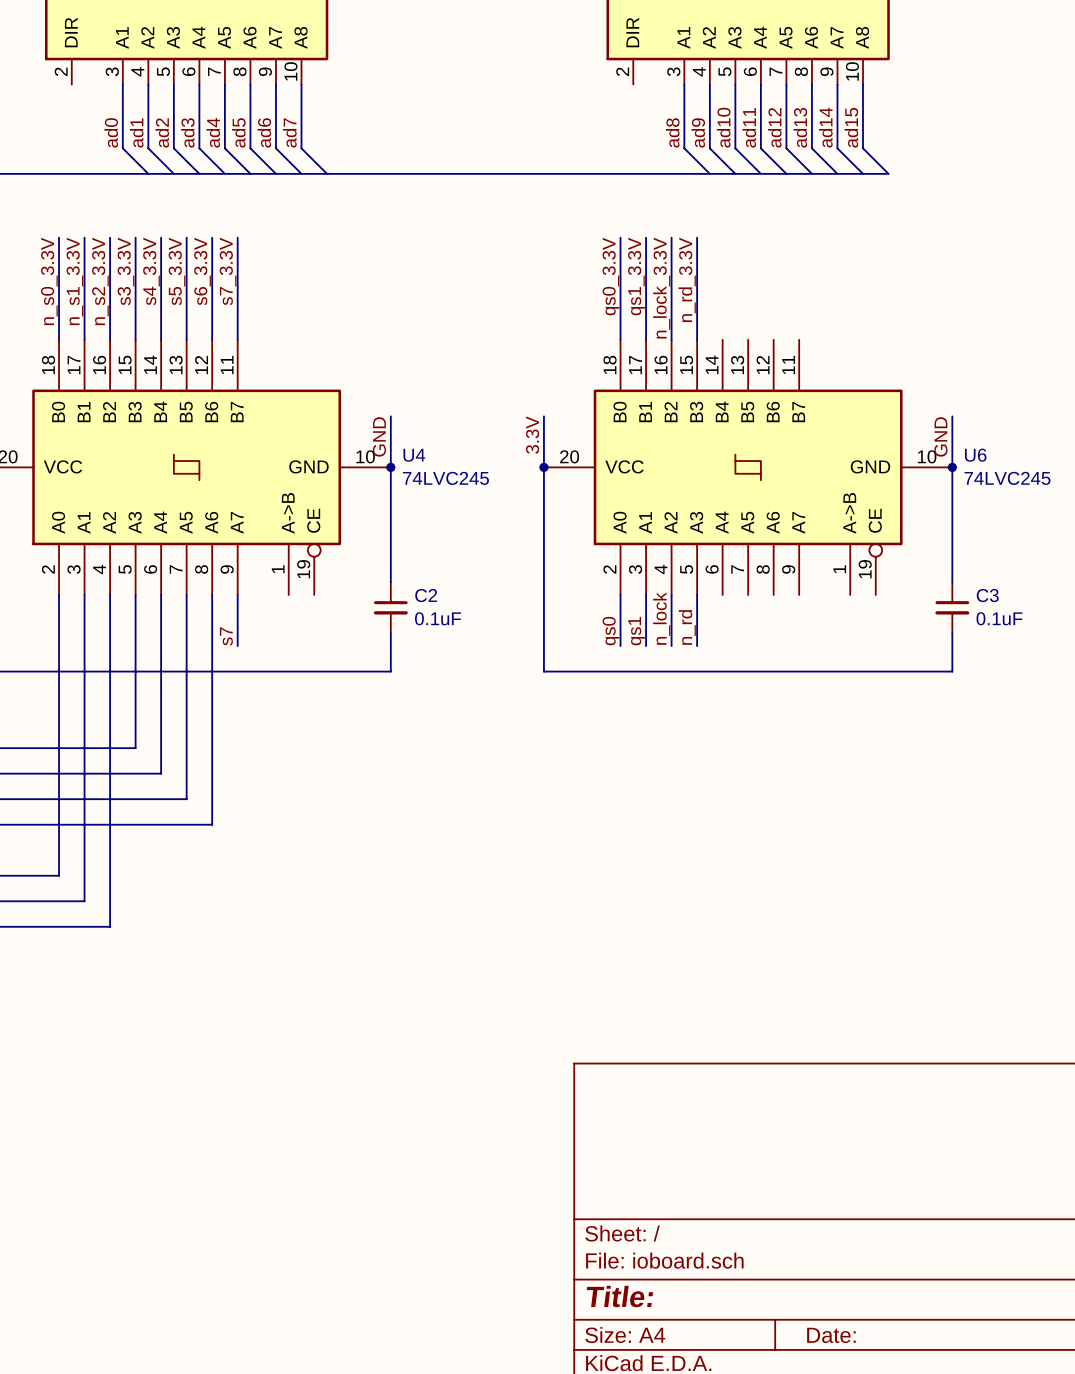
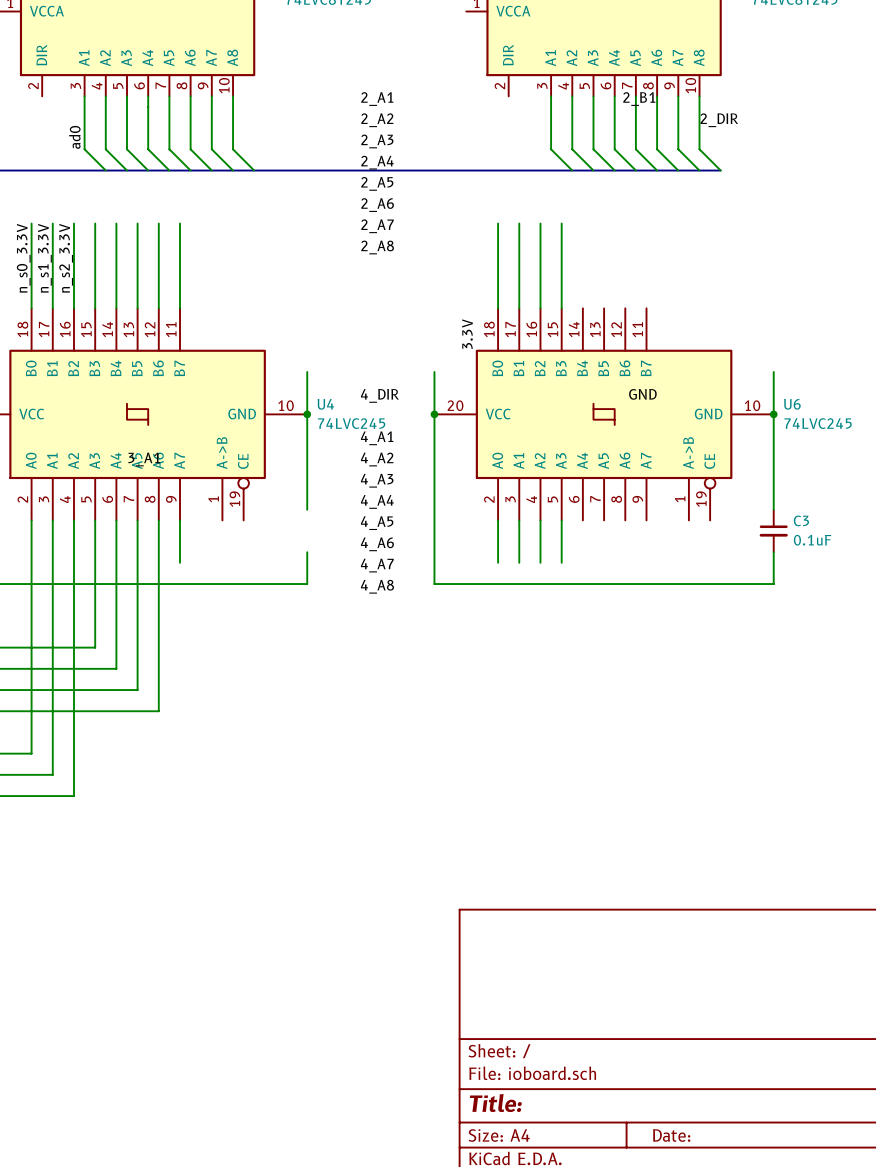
label: none -> 2_A1 (377, 99)
label: none -> 2_B1 (639, 99)
label: none -> 2_A2 (377, 120)
label: none -> 2_DIR (719, 120)
label: ad10 (723, 127) -> none
label: ad11 (749, 127) -> none
label: ad12 (774, 127) -> none
label: ad13 (800, 127) -> none
label: ad14 (825, 127) -> none
label: ad15 (851, 127) -> none
label: ad1 (136, 132) -> none
label: ad2 (162, 132) -> none
label: ad3 (187, 132) -> none
label: ad4 (213, 132) -> none
label: ad5 (238, 132) -> none
label: ad6 (264, 132) -> none
label: ad7 (289, 132) -> none
label: ad8 (672, 132) -> none
label: ad9 (698, 132) -> none
label: none -> 2_A3 (377, 141)
label: none -> 2_A4 (377, 162)
label: none -> 2_A5 (377, 183)
label: none -> 2_A6 (377, 205)
label: none -> 2_A7 (377, 226)
label: none -> 2_A8 (377, 247)
label: s3_3.3V (125, 271) -> none
label: s4_3.3V (151, 271) -> none
label: s5_3.3V (177, 271) -> none
label: s6_3.3V (202, 271) -> none
label: s7_3.3V (228, 271) -> none
label: qs0_3.3V (610, 276) -> none
label: qs1_3.3V (636, 276) -> none
label: n_rd_3.3V (687, 279) -> none
label: n_lock_3.3V (661, 288) -> none
label position: 3.3V (532, 435) -> 3.3V (467, 334)
label: GND (379, 436) -> none
label rotation: 0° (940, 436) -> 90° clockwise (642, 394)
label position: GND (940, 436) -> GND (642, 394)
label: none -> 4_DIR (379, 395)
label: none -> 4_A1 (377, 438)
label: none -> 3_A1 (144, 459)
label: none -> 4_A2 (377, 459)
label: none -> 4_A3 (377, 480)
label: none -> 4_A4 (377, 501)
label: none -> 4_A5 (377, 523)
C2: 0.1uF (390, 607) -> none
label: n_lock (661, 618) -> none
label: none -> 4_A6 (377, 544)
label: n_rd (687, 627) -> none
label: qs0 (610, 631) -> none
label: qs1 (636, 631) -> none
label: s7 (226, 636) -> none
label: none -> 4_A7 (377, 565)
label: none -> 4_A8 (377, 586)

